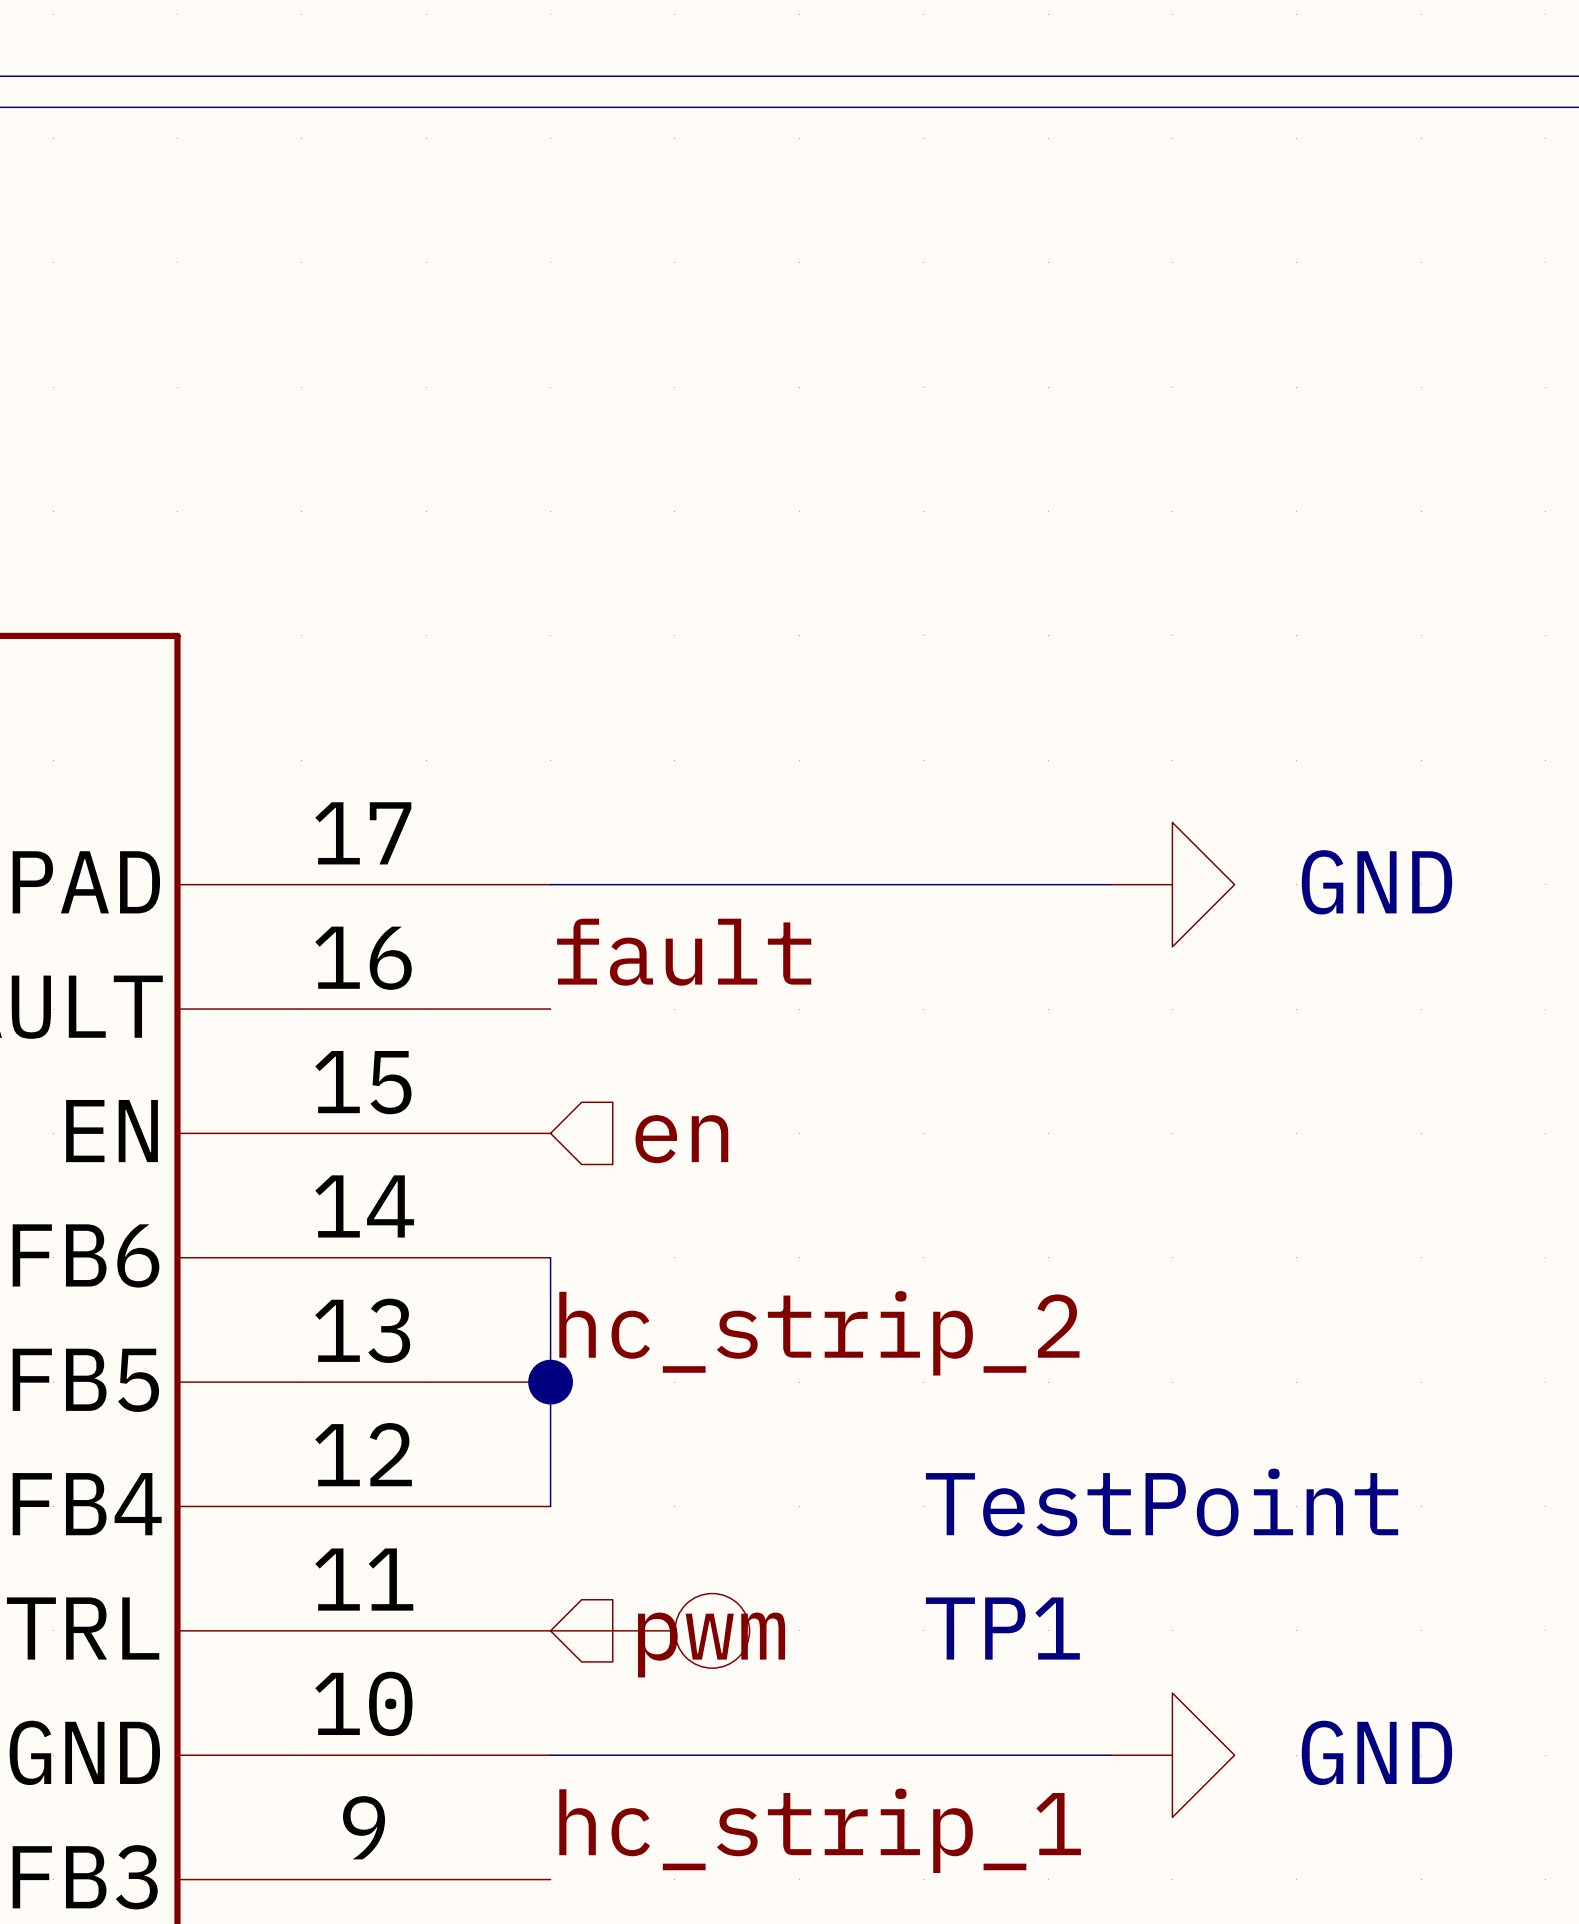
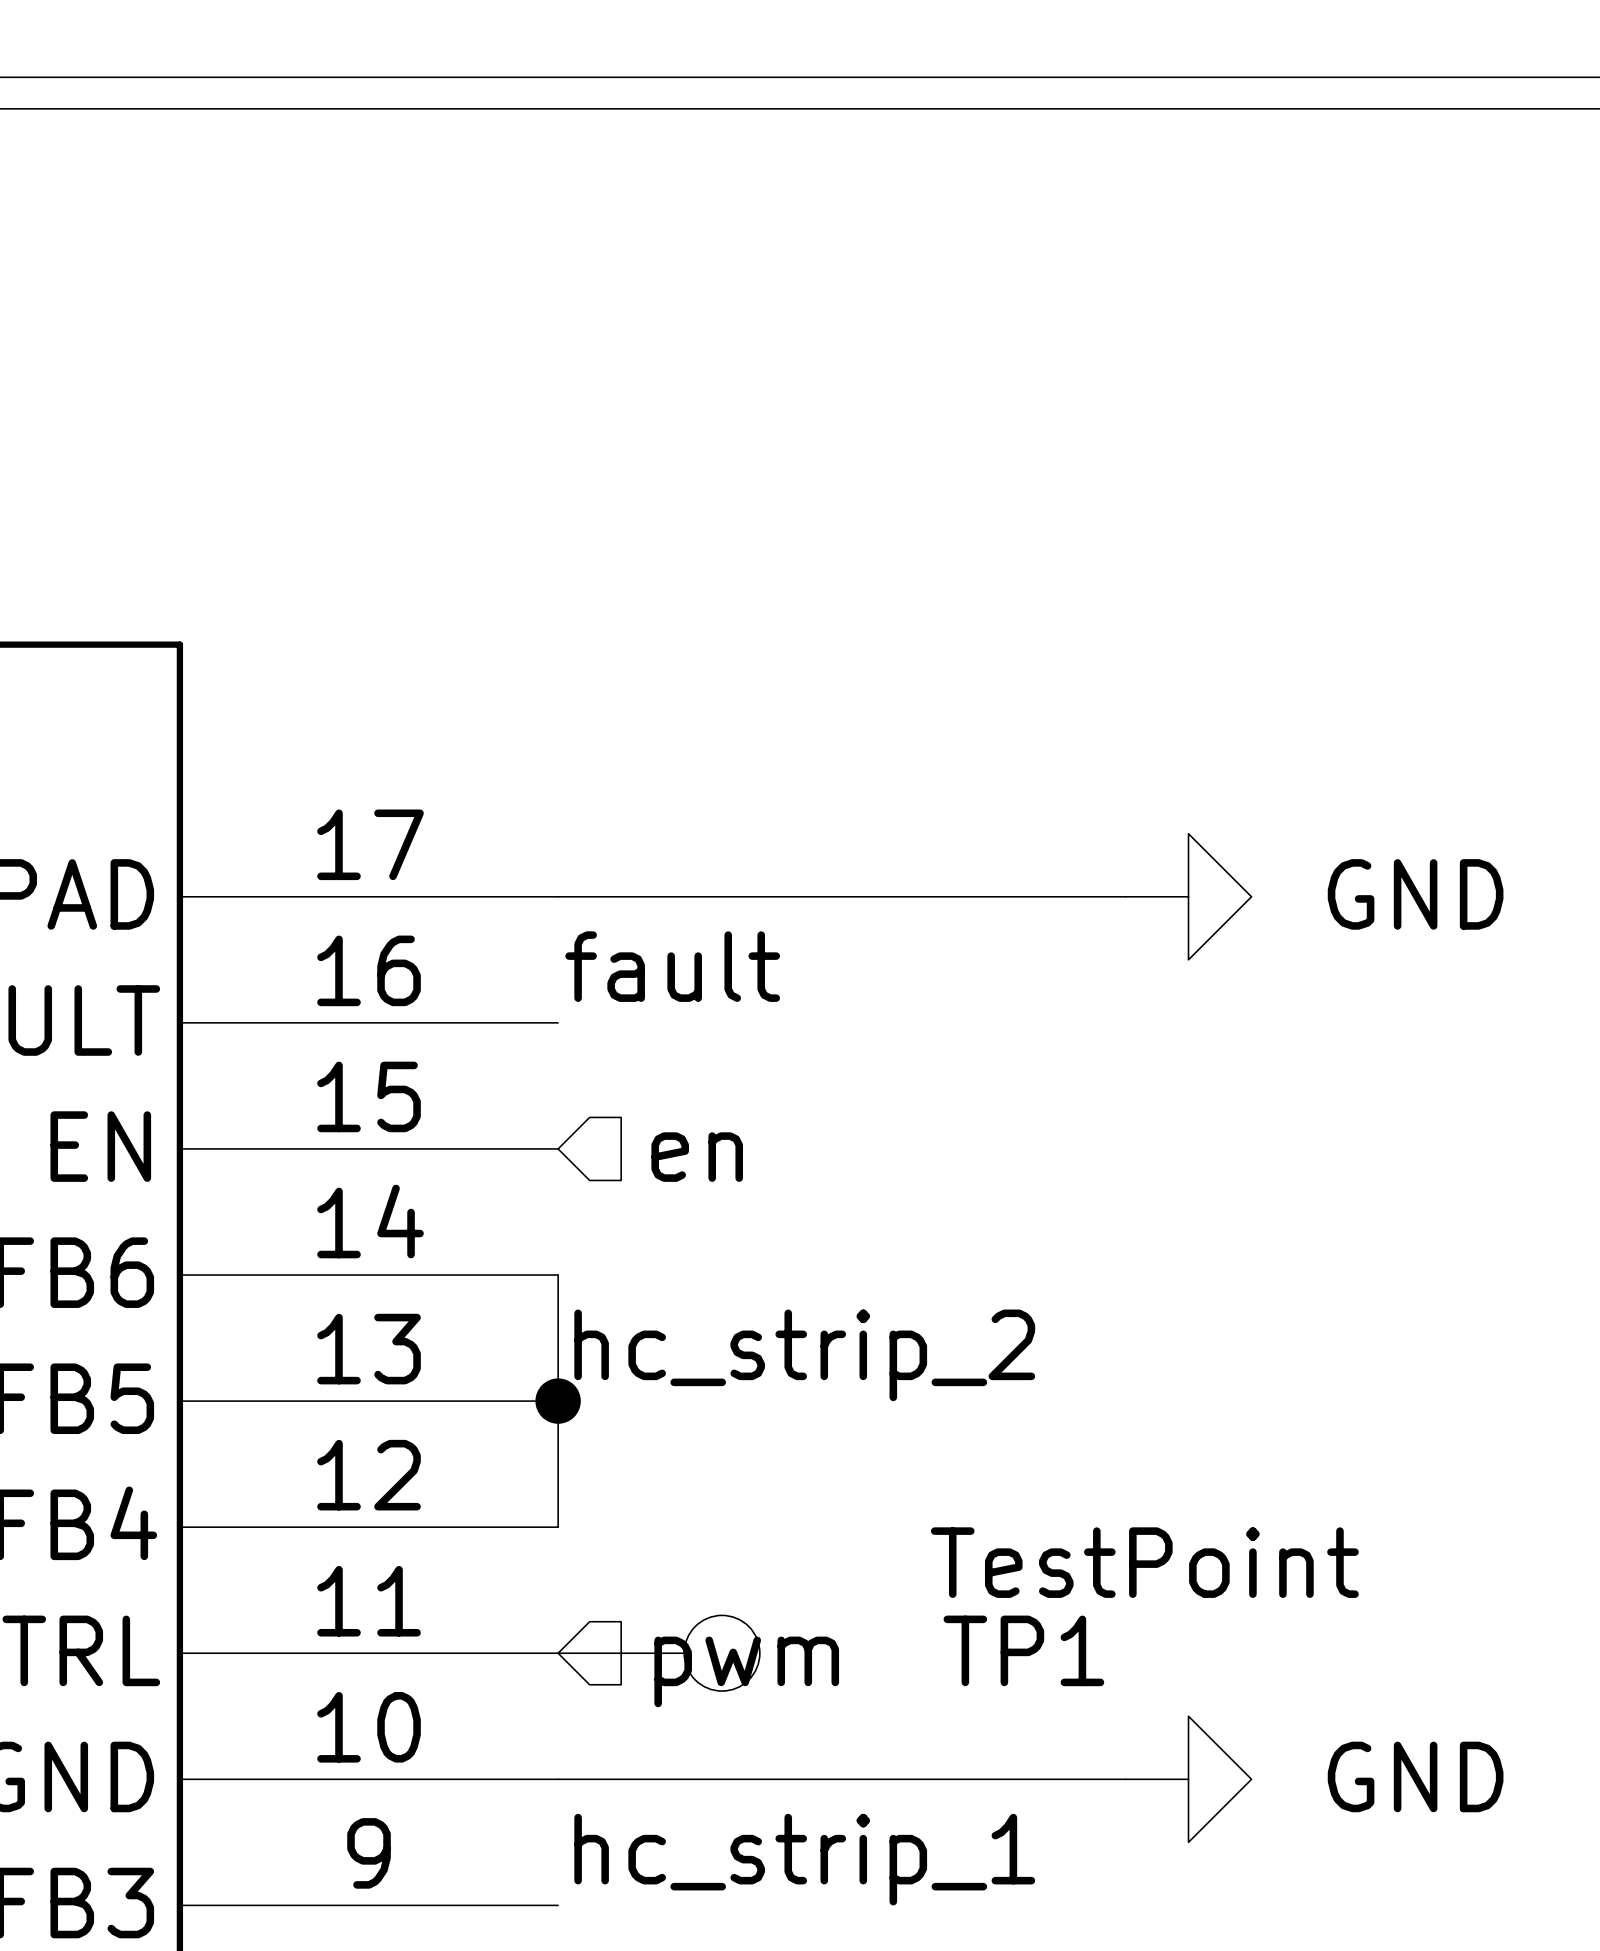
TP1 value position: TestPoint (1162, 1502) -> TestPoint (1144, 1562)

